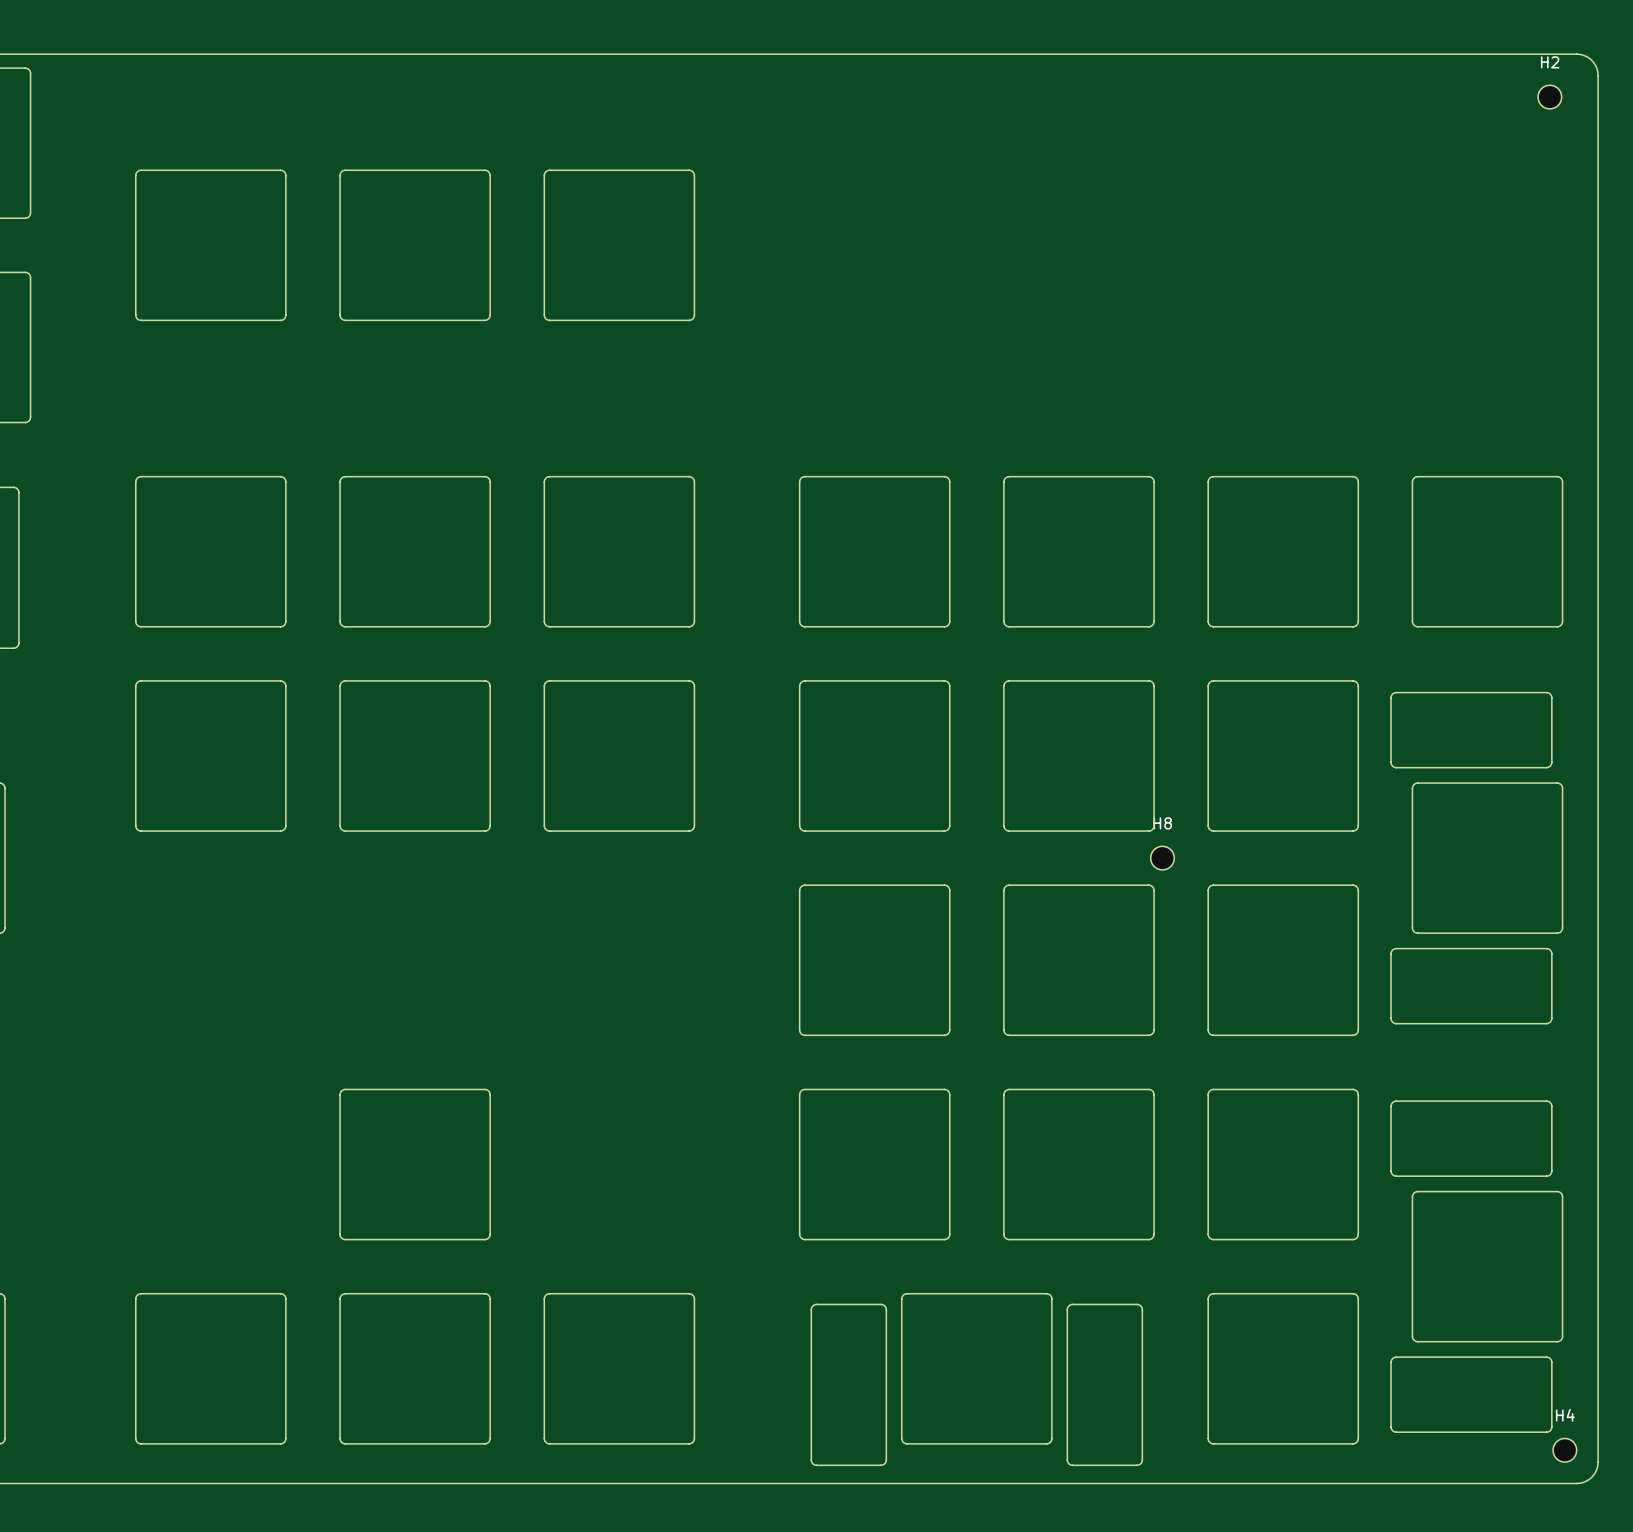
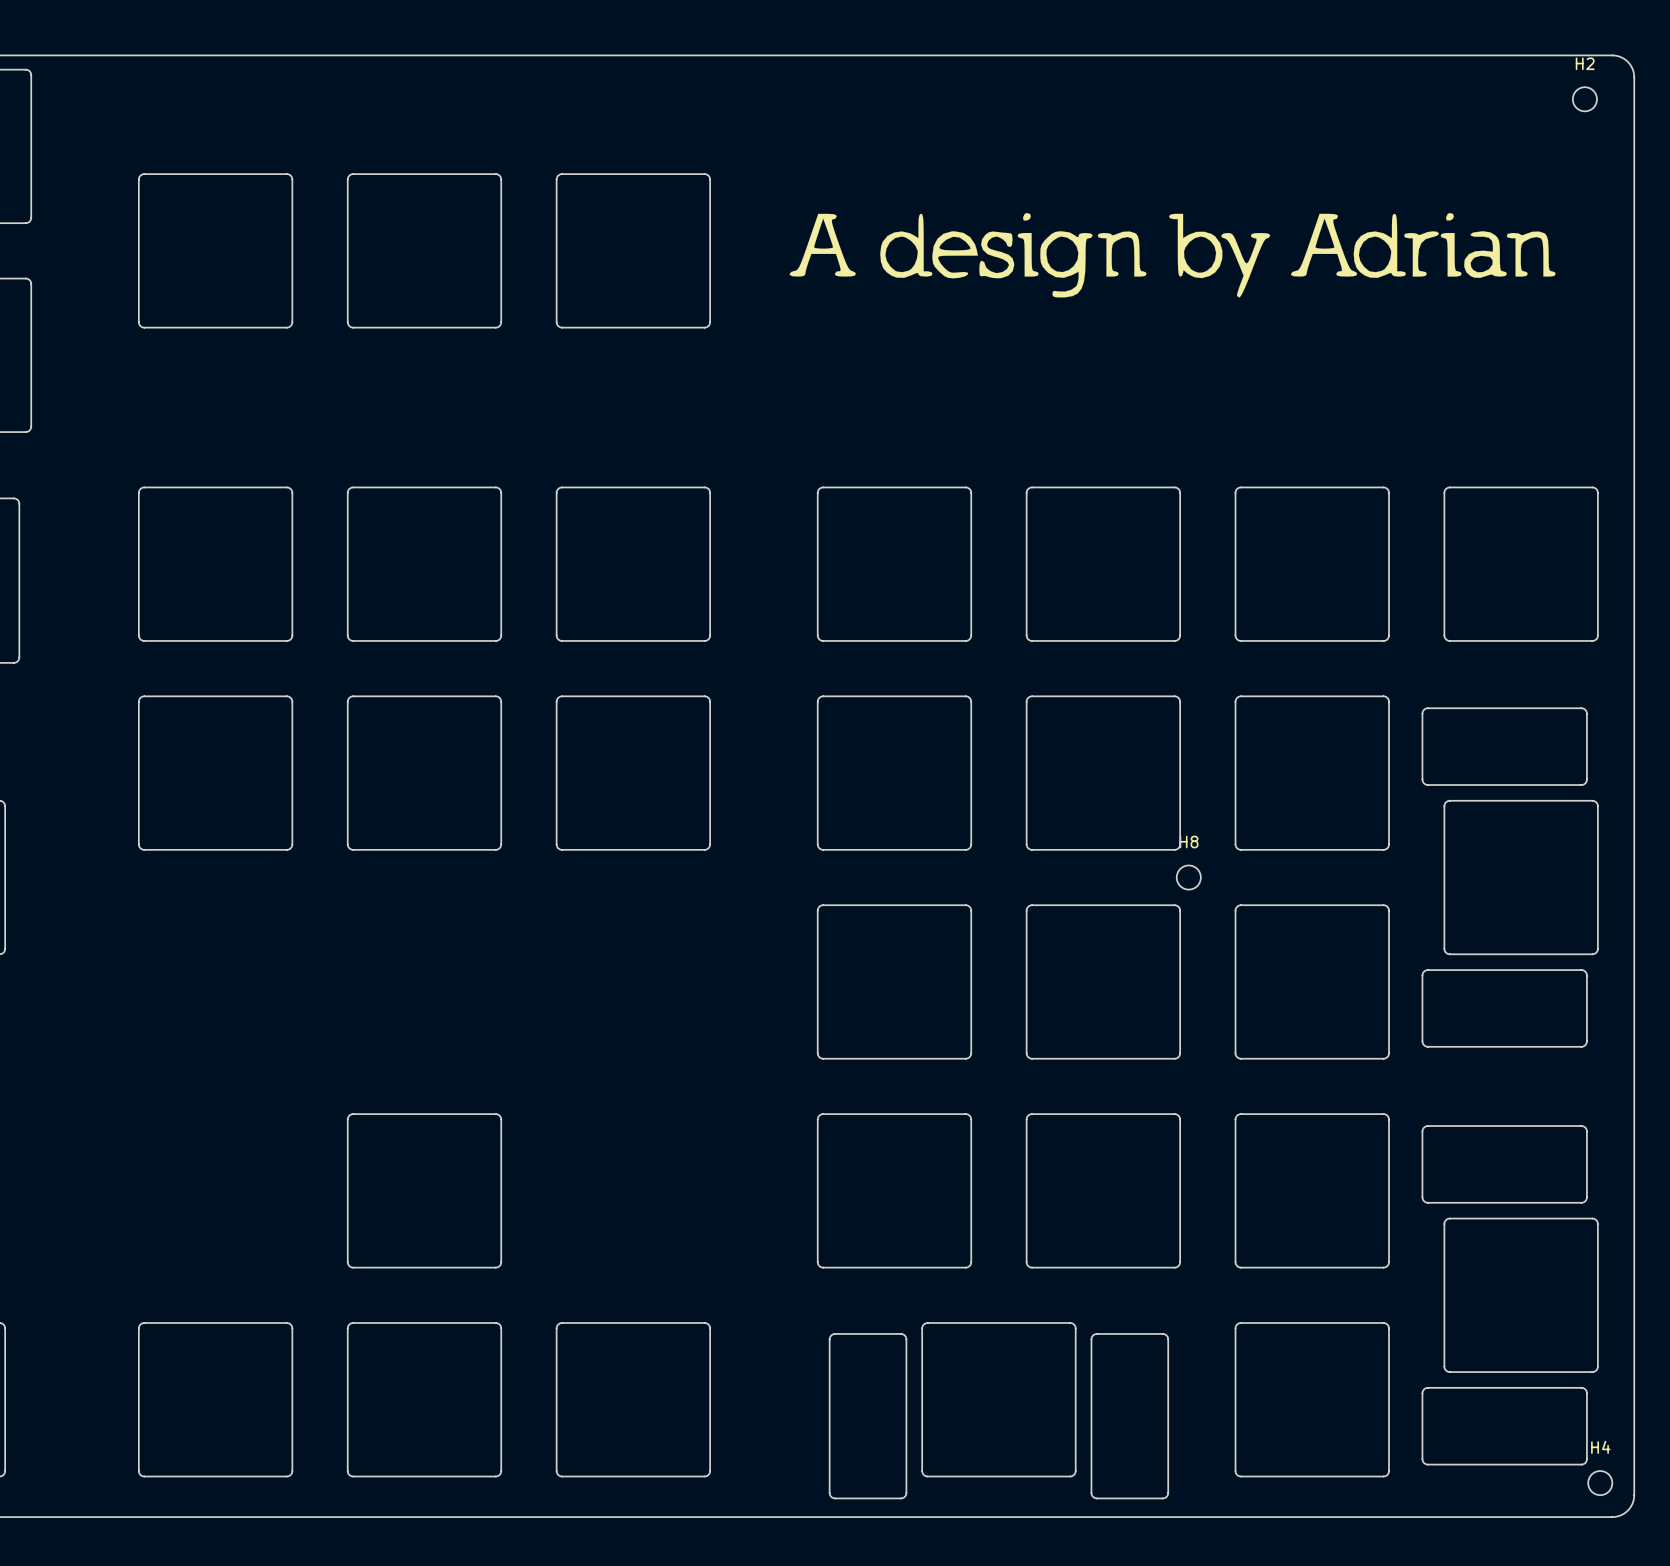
drawing: none -> [789, 212, 1556, 298]

